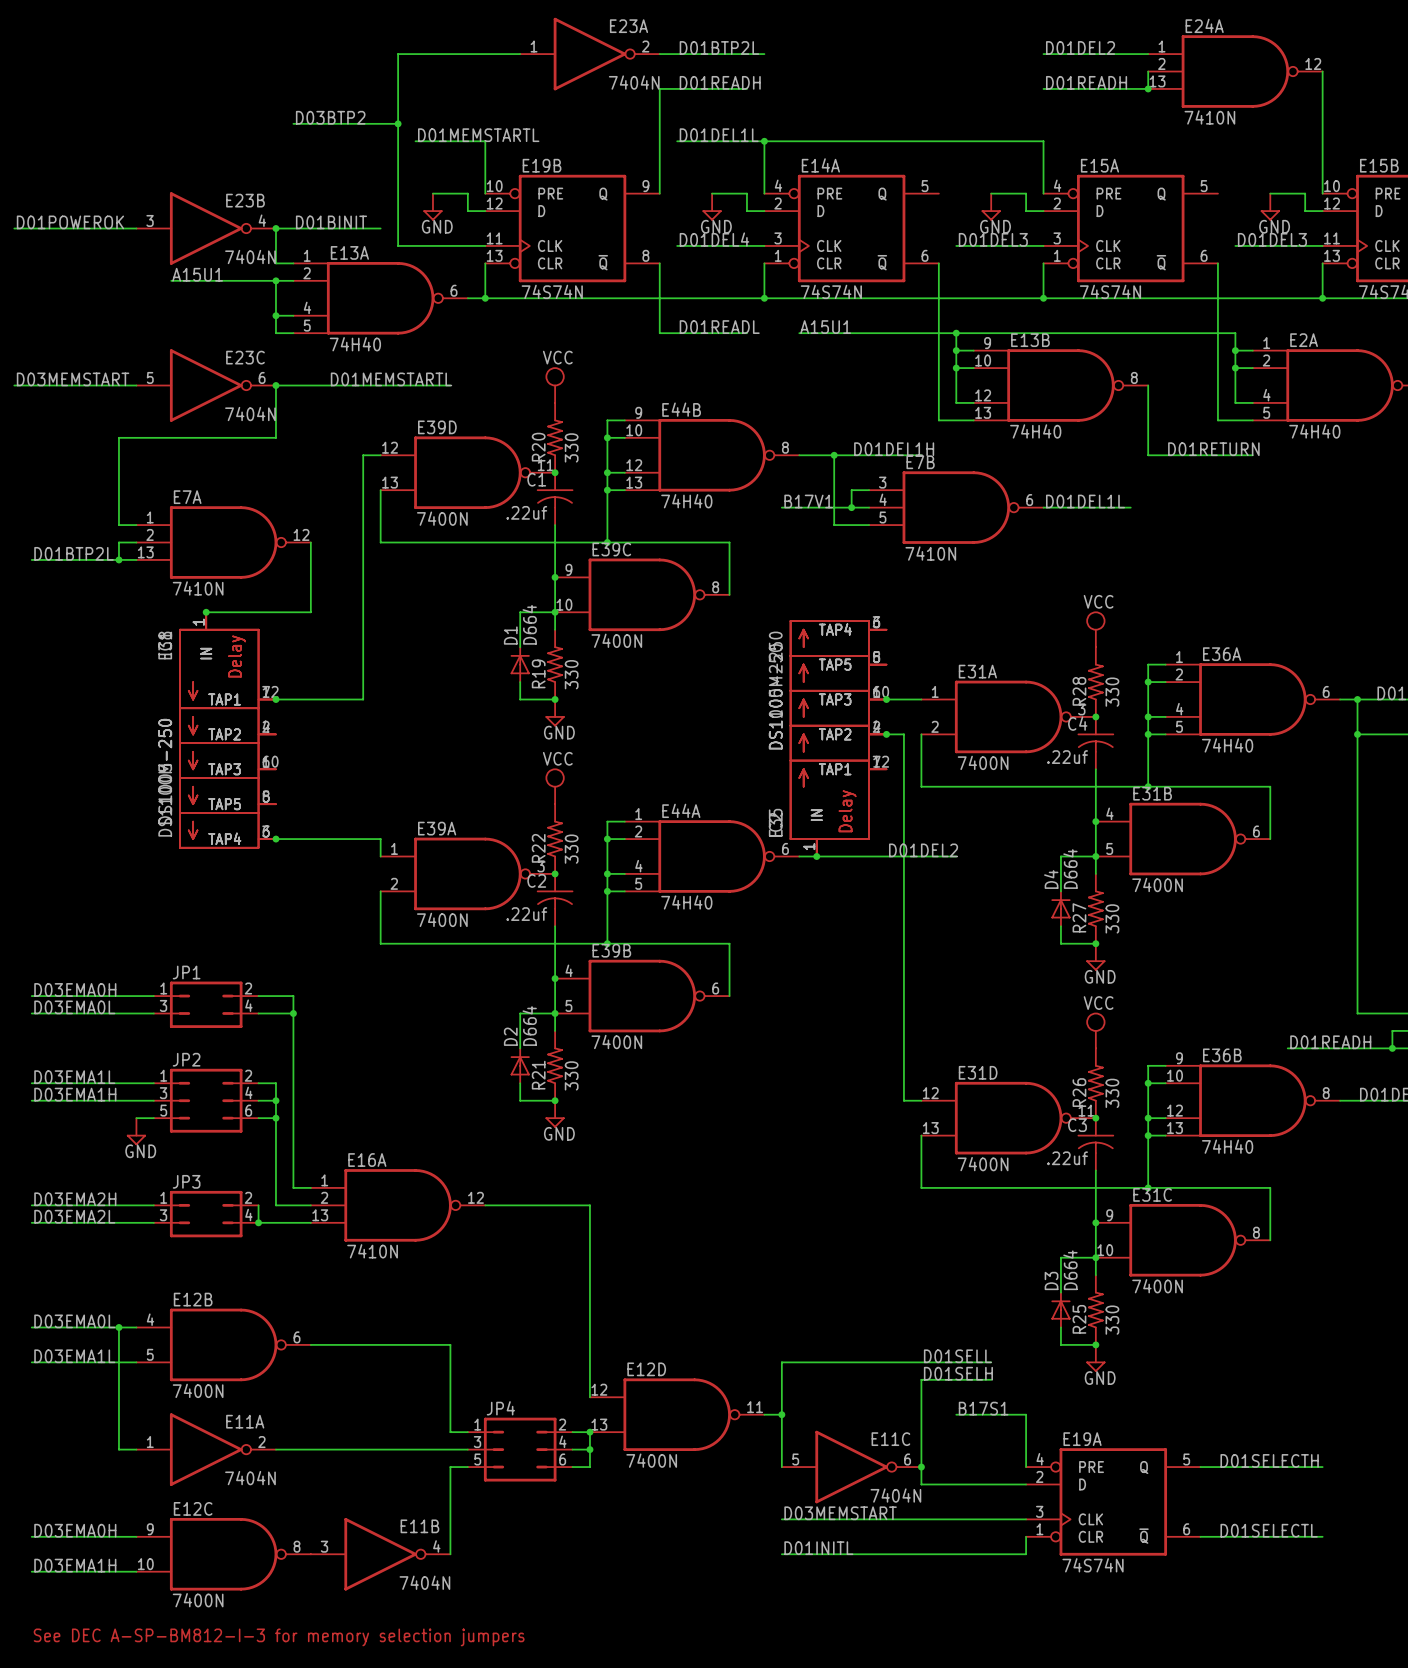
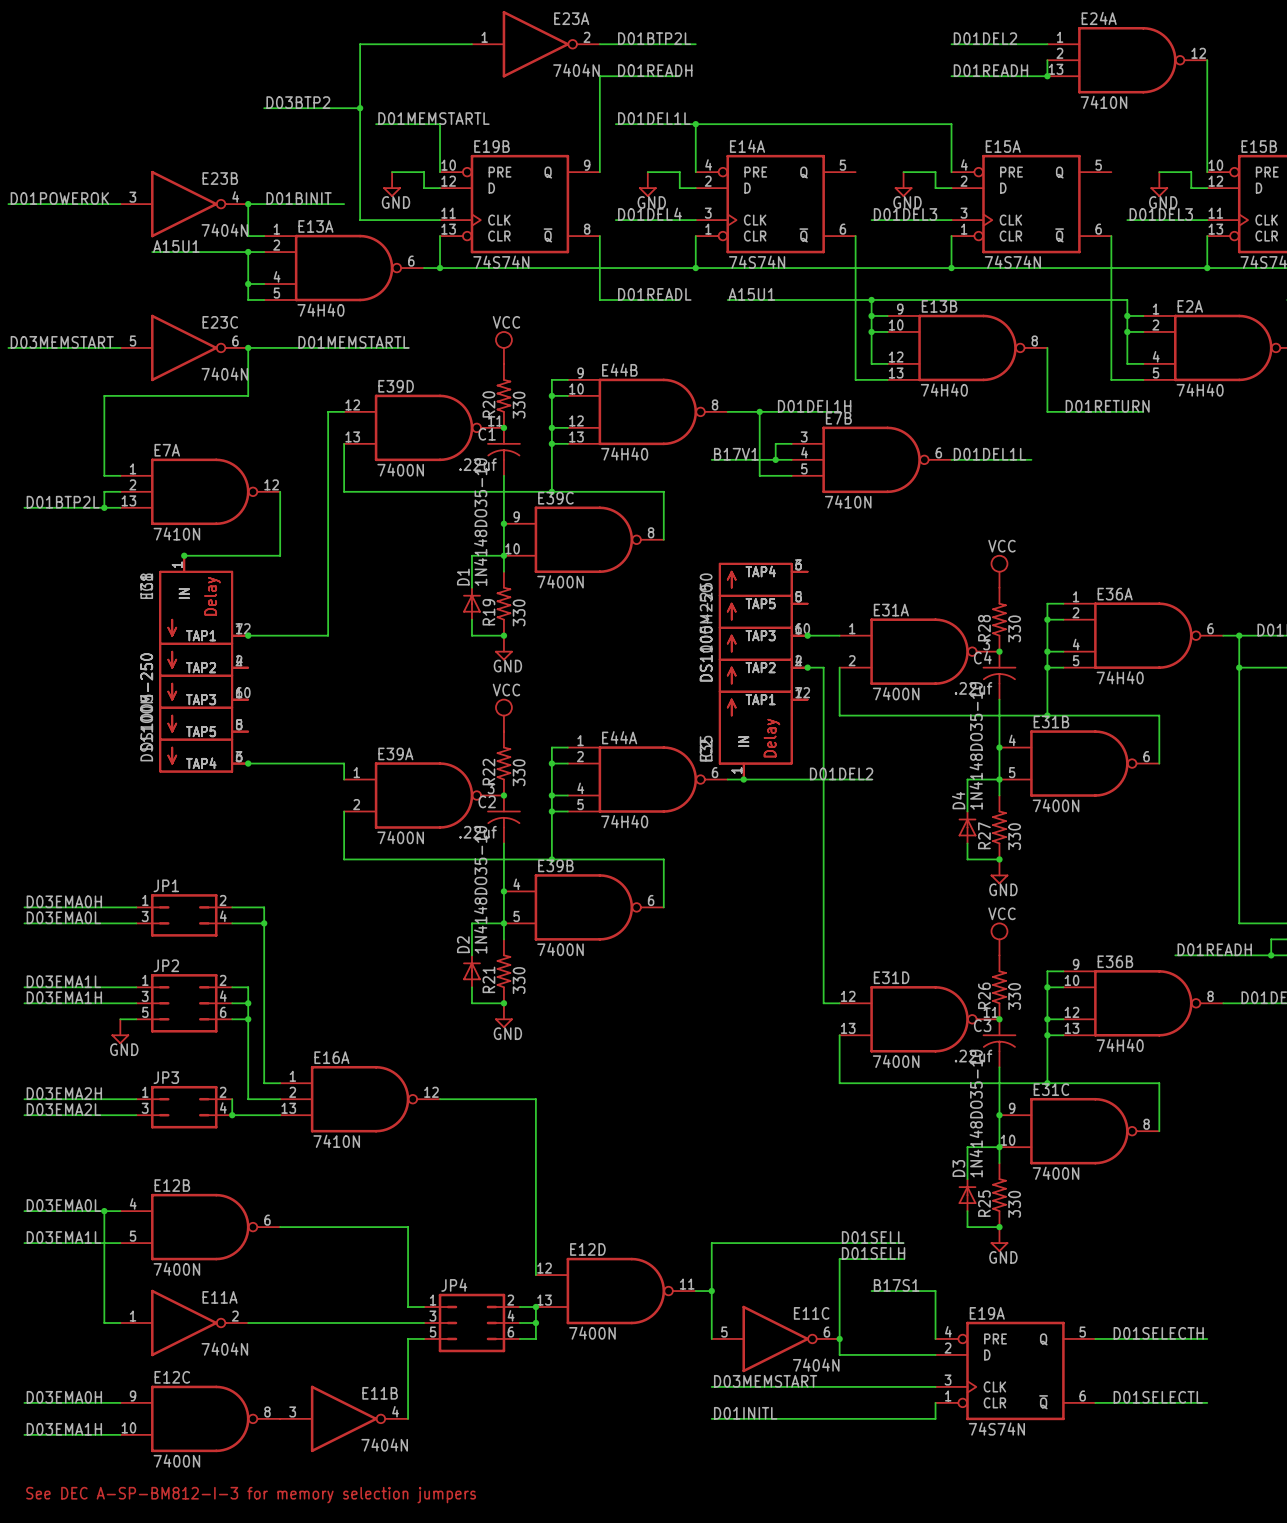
D1 value: D664 (529, 624) -> 1N4148DO35-10 (480, 522)
D4 value: D664 (1070, 869) -> 1N4148DO35-10 (976, 745)
D2 value: D664 (529, 1026) -> 1N4148DO35-10 (480, 889)
D3 value: D664 (1070, 1270) -> 1N4148DO35-10 (976, 1113)

